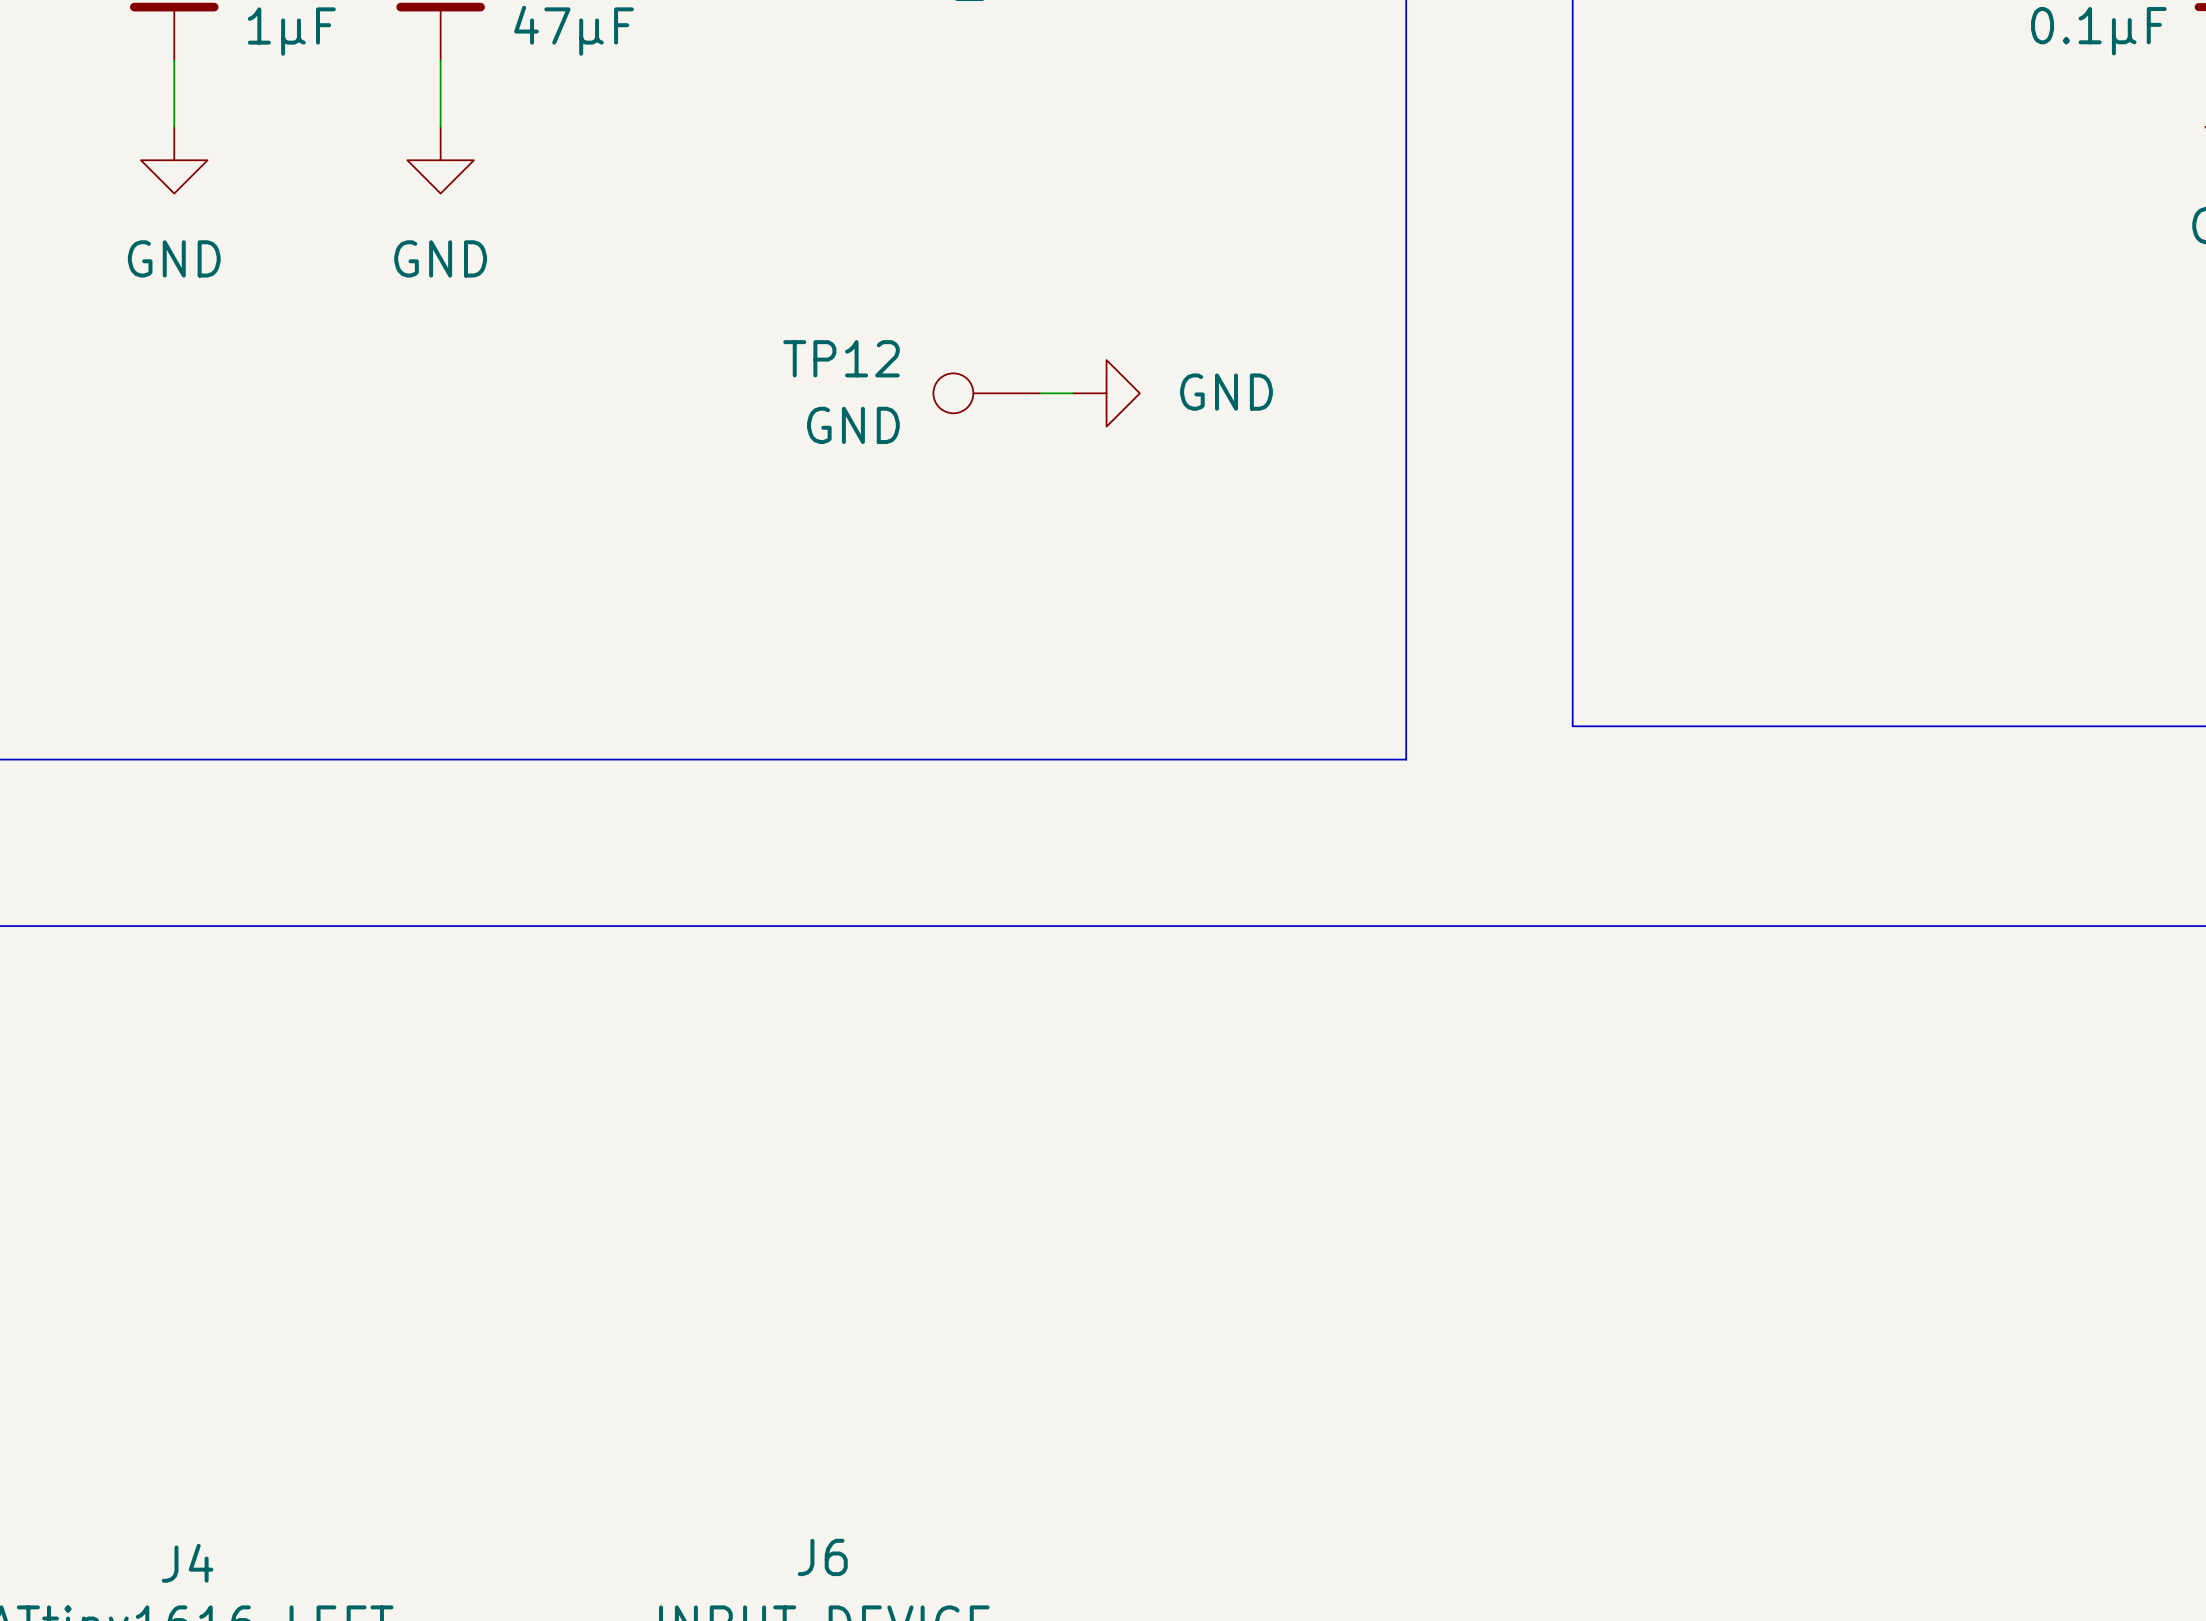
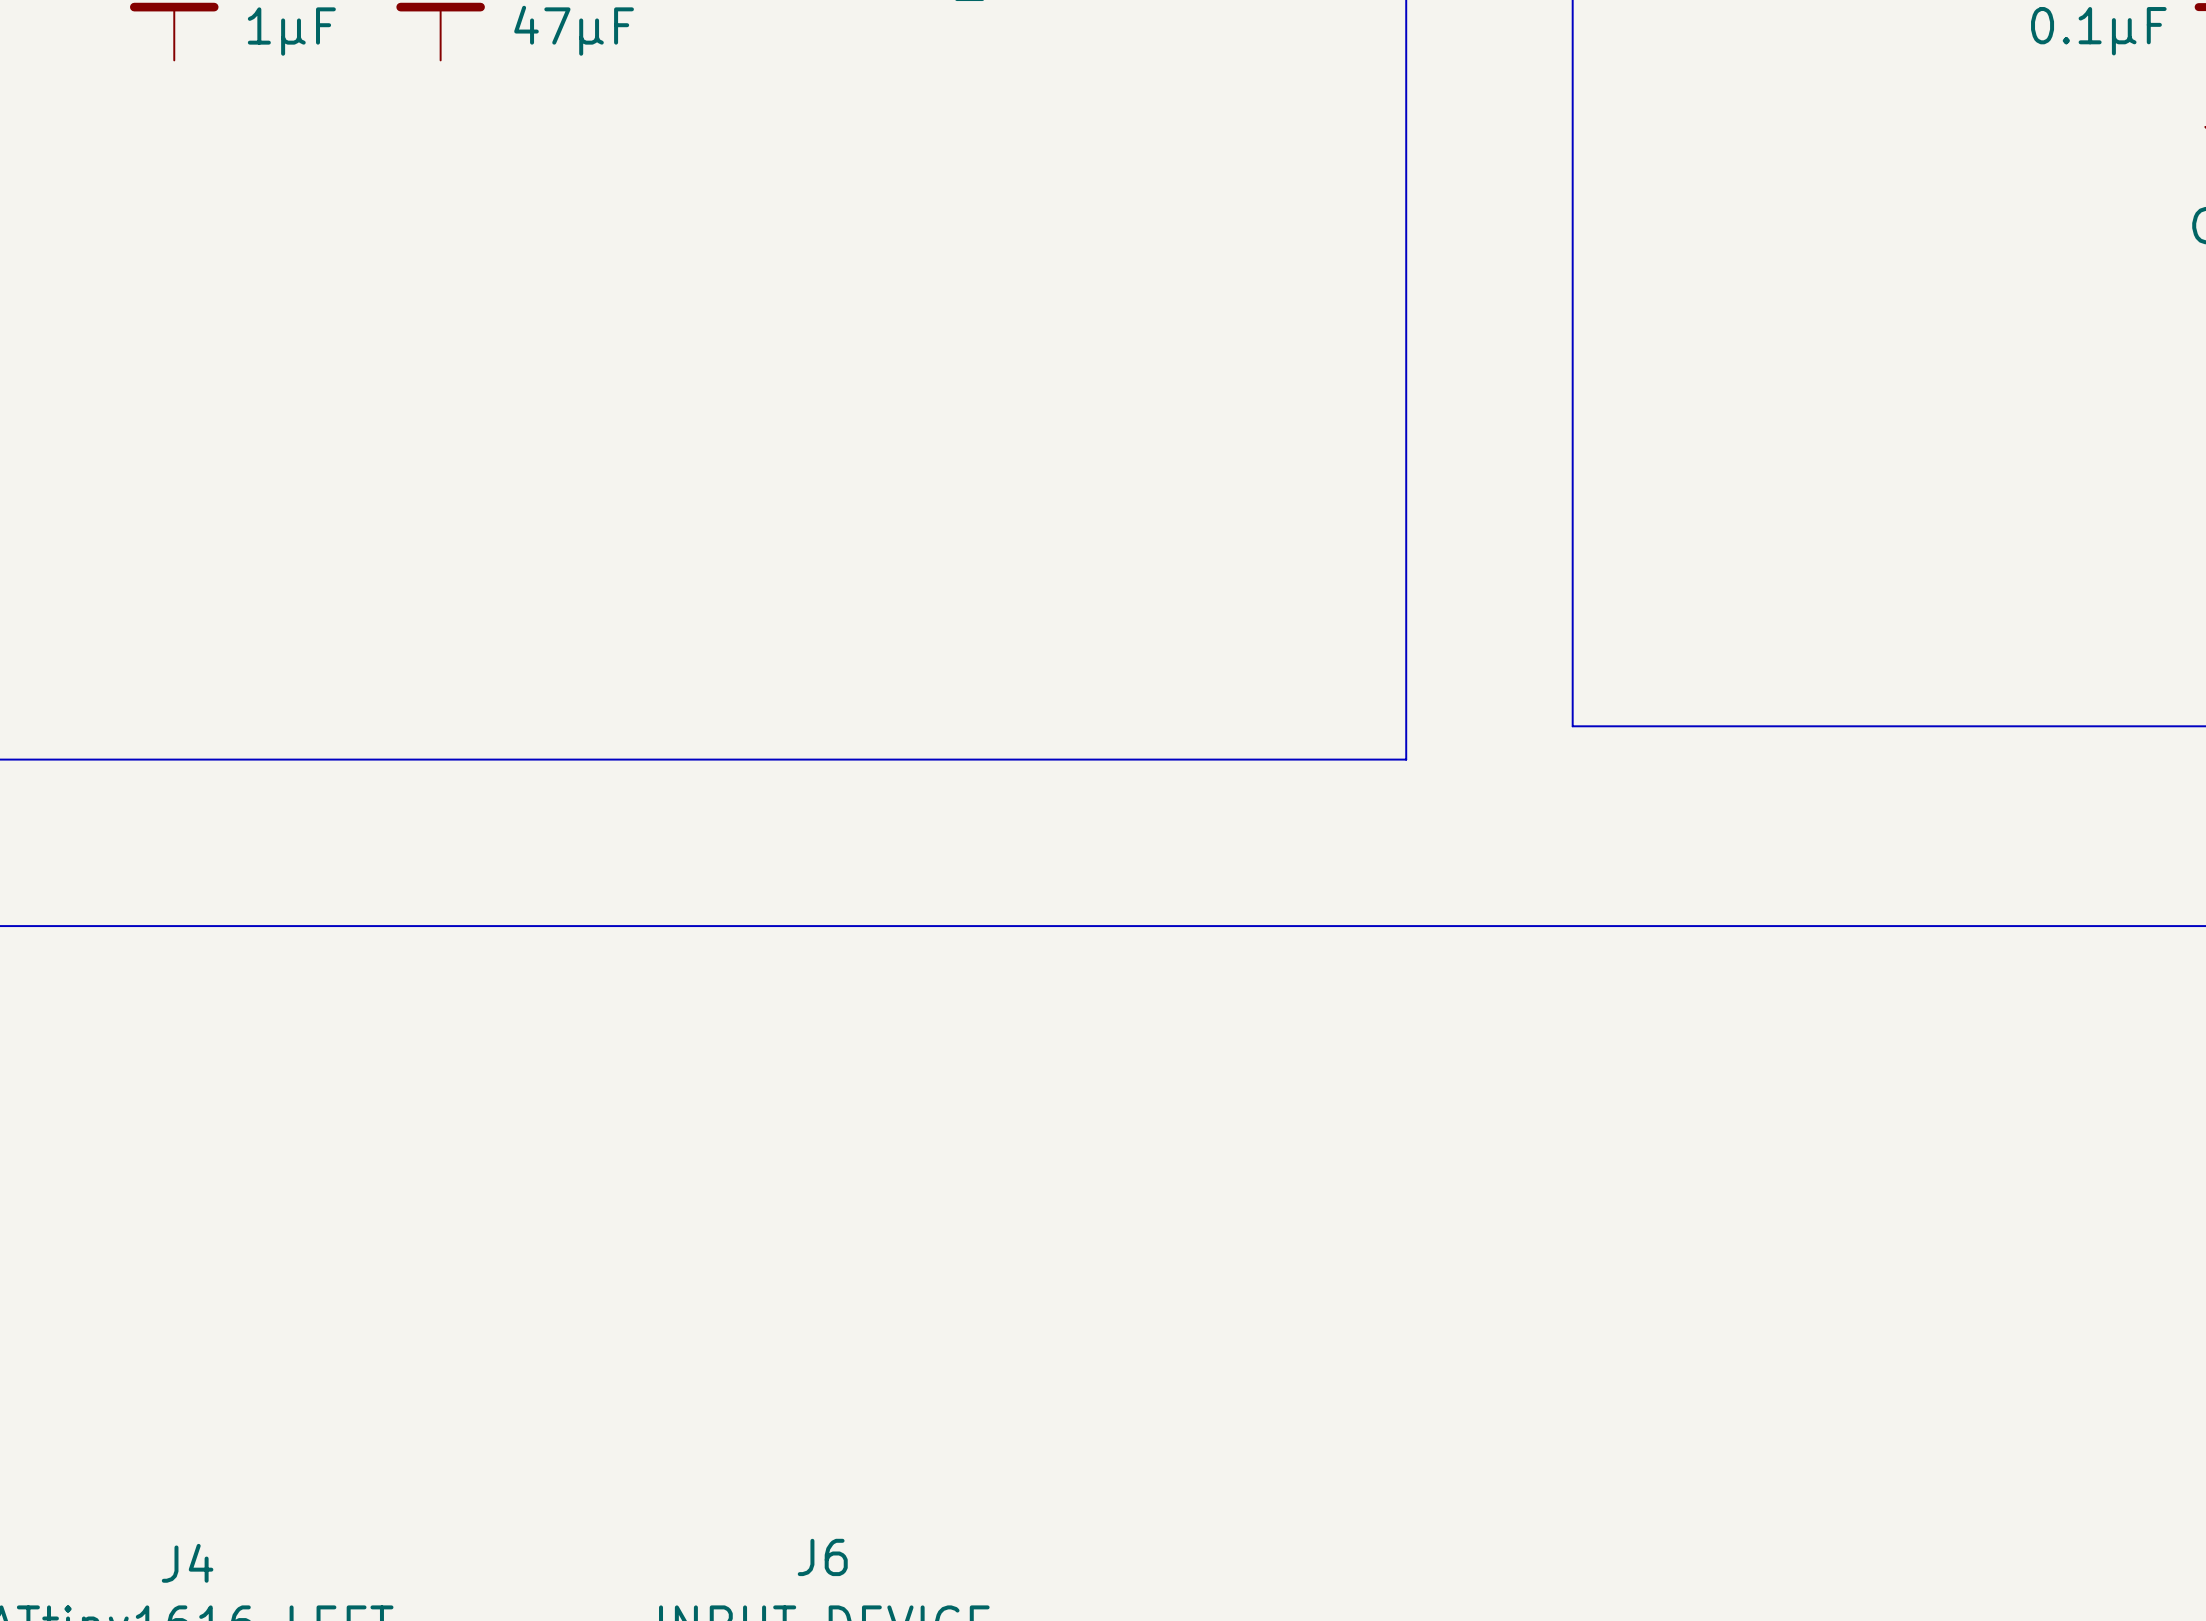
wire: (174, 60) (174, 126) -> none
wire: (440, 60) (440, 126) -> none
power symbol: GND (174, 160) -> none
power symbol: GND (440, 160) -> none
TP12: GND (986, 393) -> none
wire: (1039, 393) (1073, 393) -> none
power symbol: GND (1106, 393) -> none

